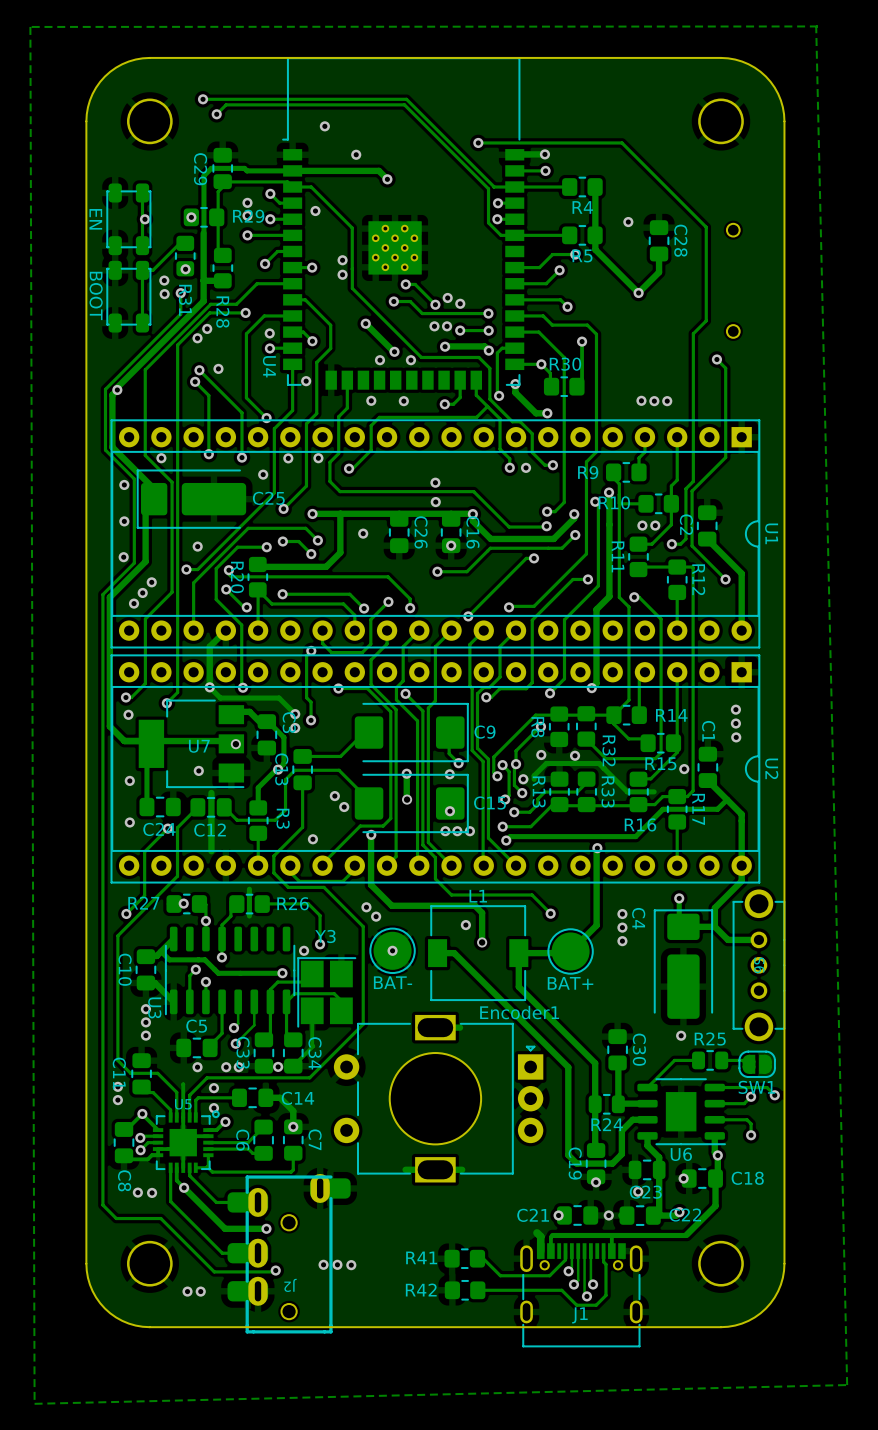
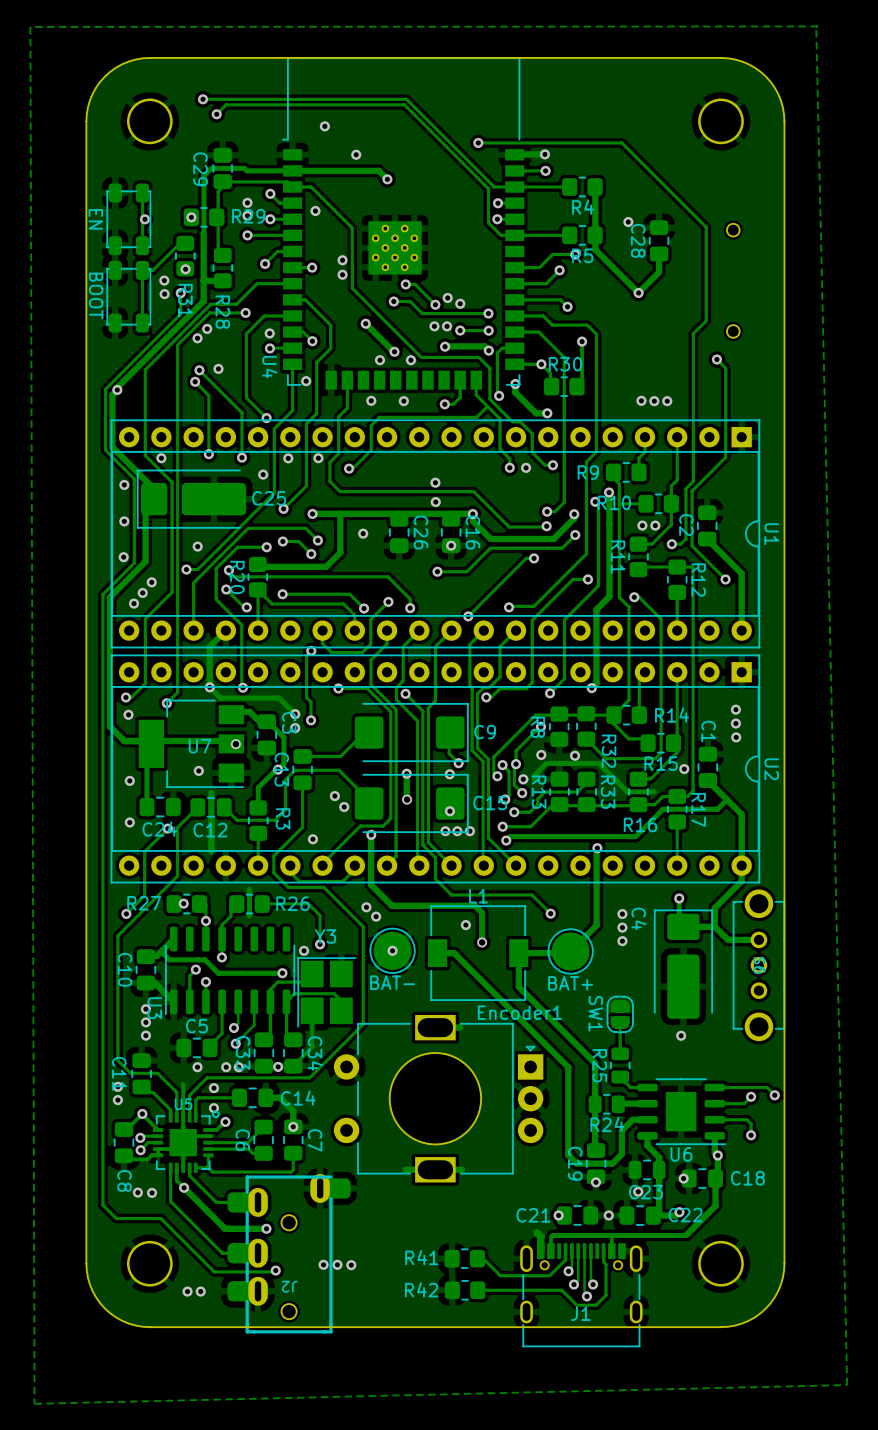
C28 name position: C28 (680, 240) -> C28 (638, 240)
track: none -> (620, 1022) (620, 1053)
R25 name position: R25 (710, 1039) -> R25 (599, 1065)
C30: (617, 1049) -> none
track: (698, 1060) (674, 1060) (647, 1087) -> (620, 1077) (630, 1087) (647, 1087)
R25 rotation: 0° (710, 1060) -> 90° clockwise (620, 1065)
R25 position: (710, 1060) -> (620, 1065)
track: (721, 1060) (745, 1060) (748, 1064) -> none
track: (617, 1062) (618, 1104) -> none
SW1 rotation: 0° (757, 1064) -> 90° clockwise (620, 1014)
SW1 position: (757, 1064) -> (620, 1014)

